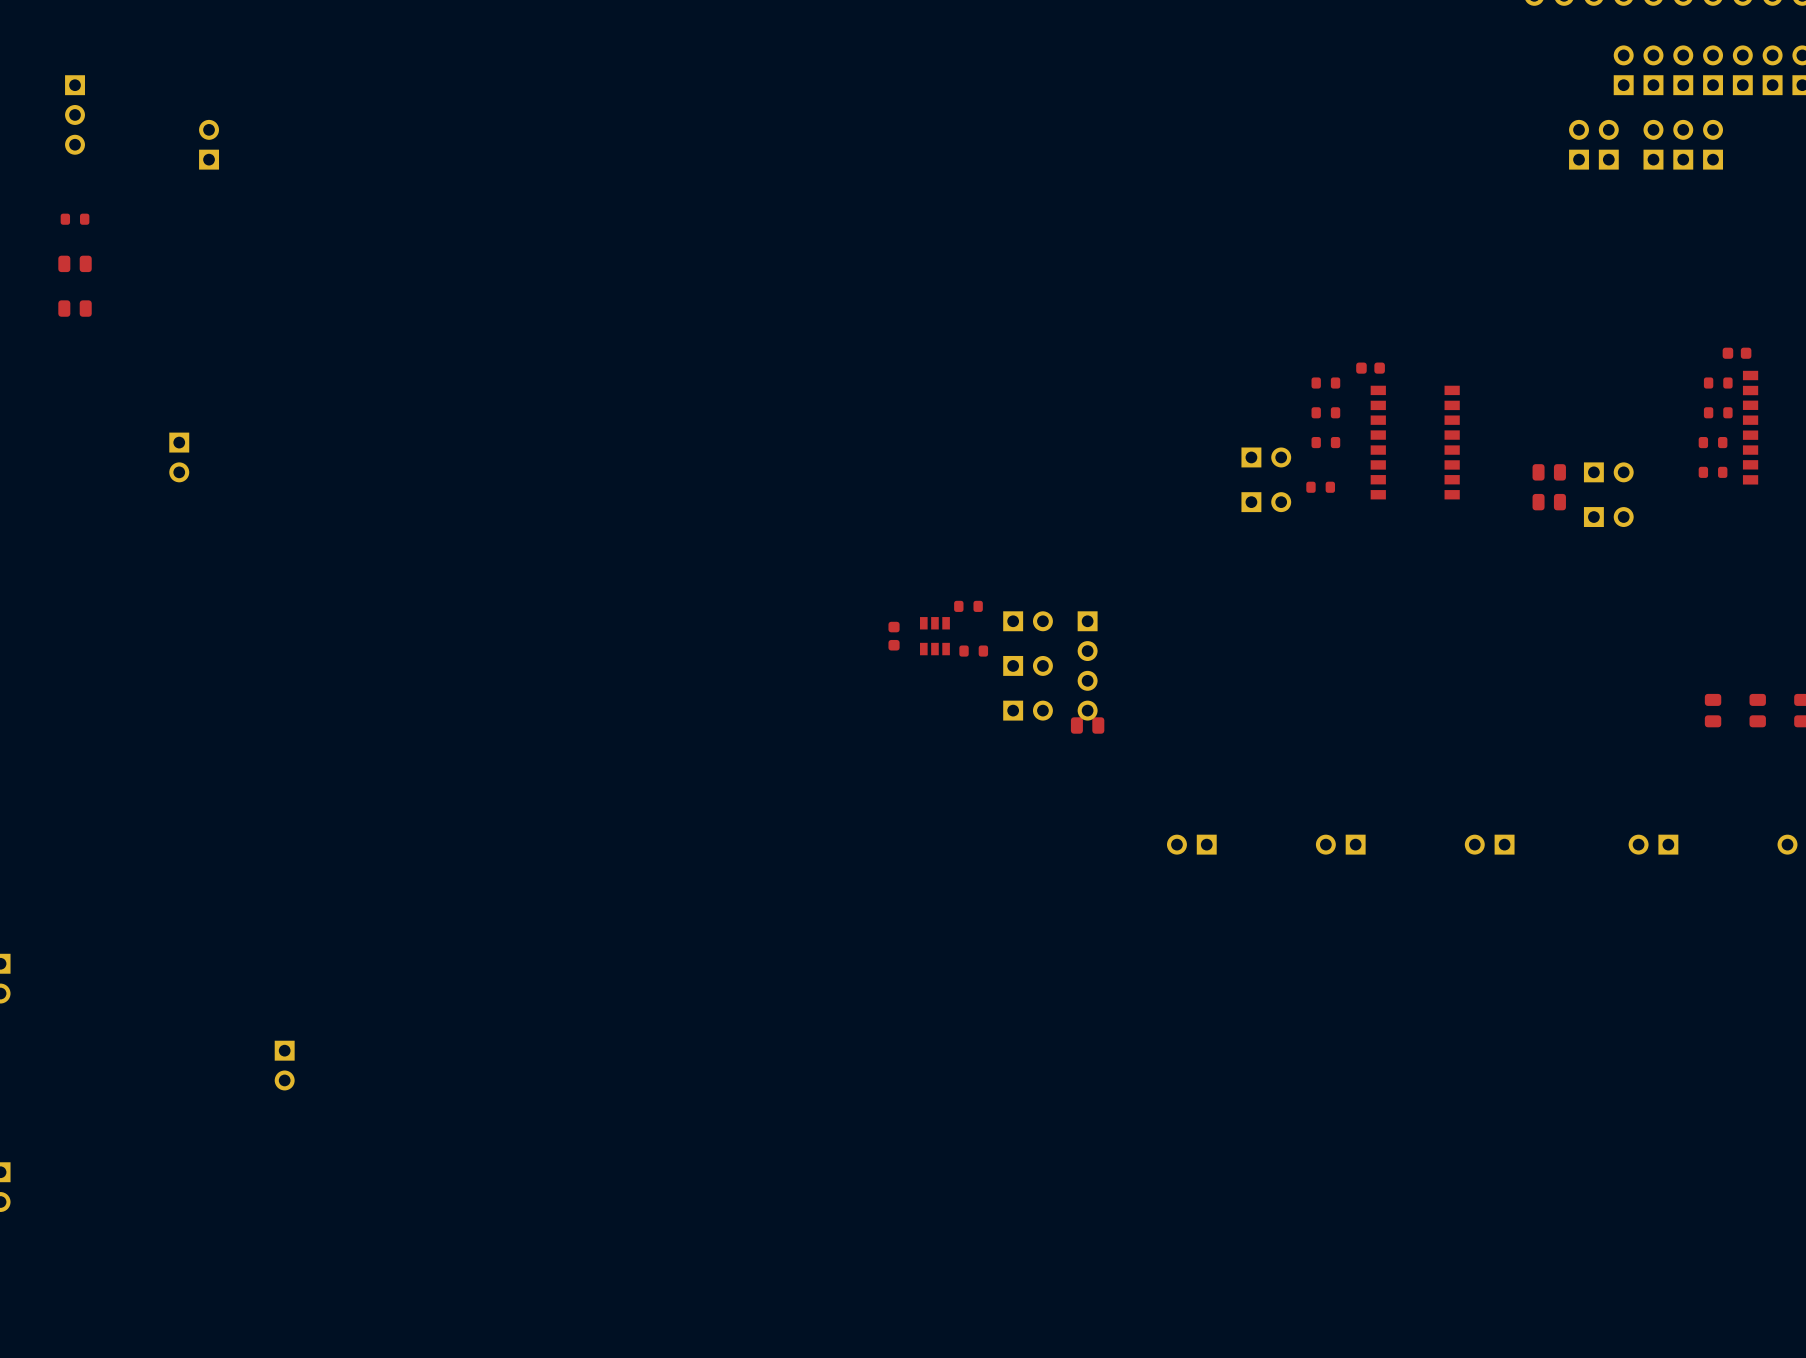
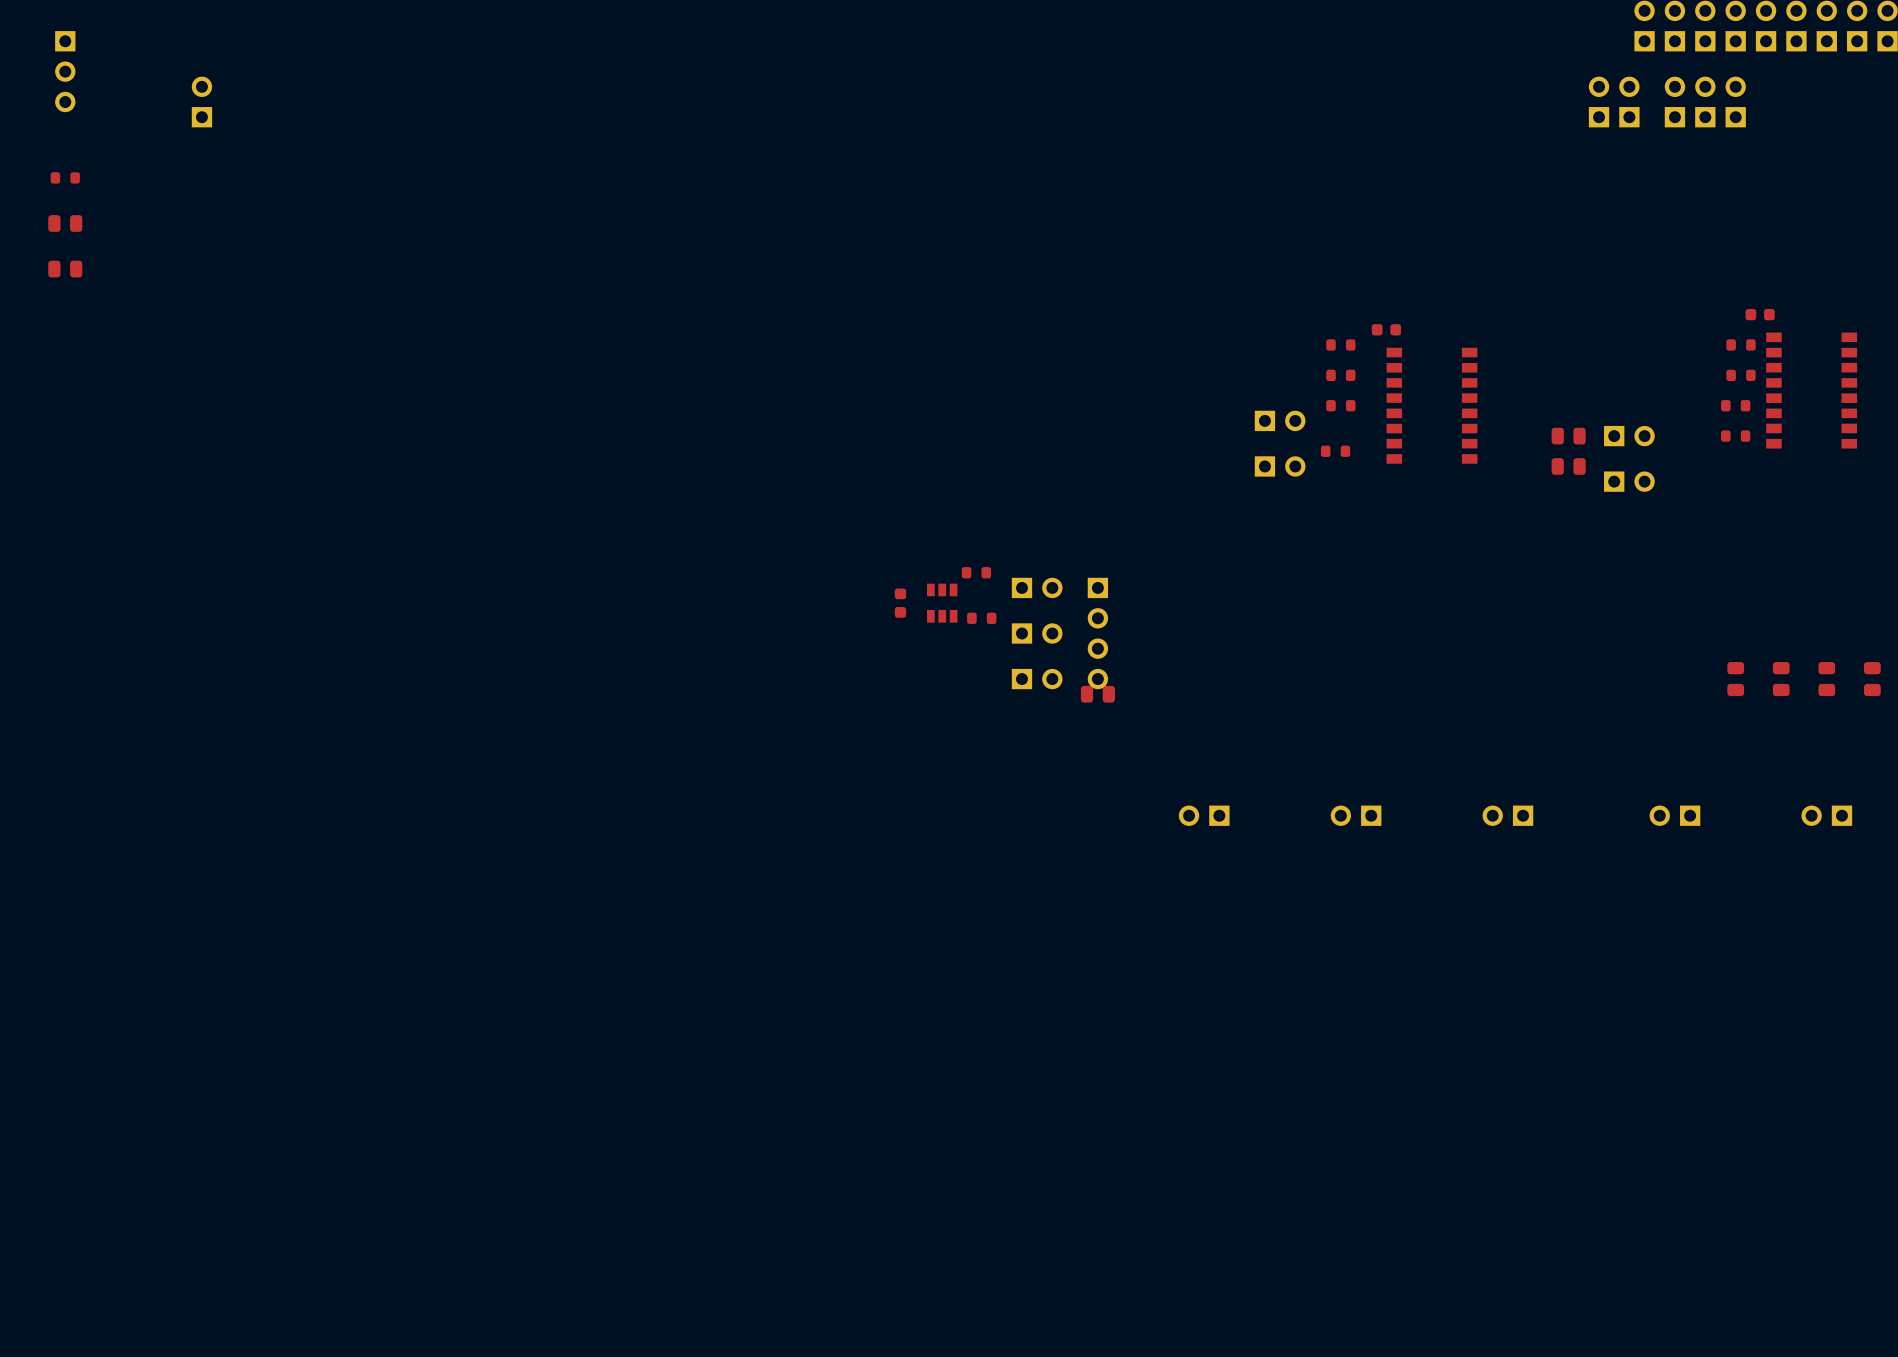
part: (179, 457) -> none
part: (284, 1065) -> none

